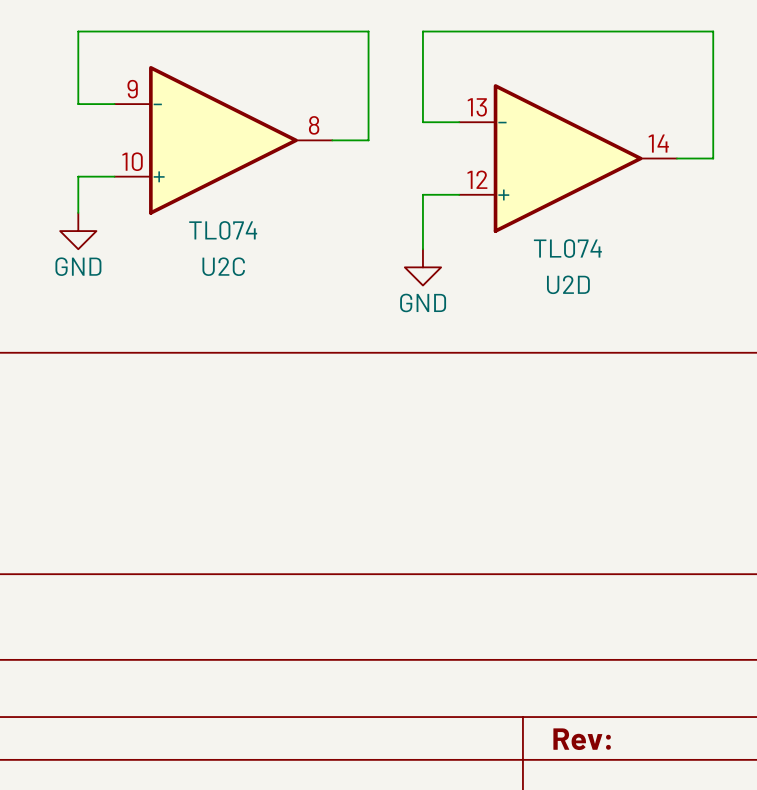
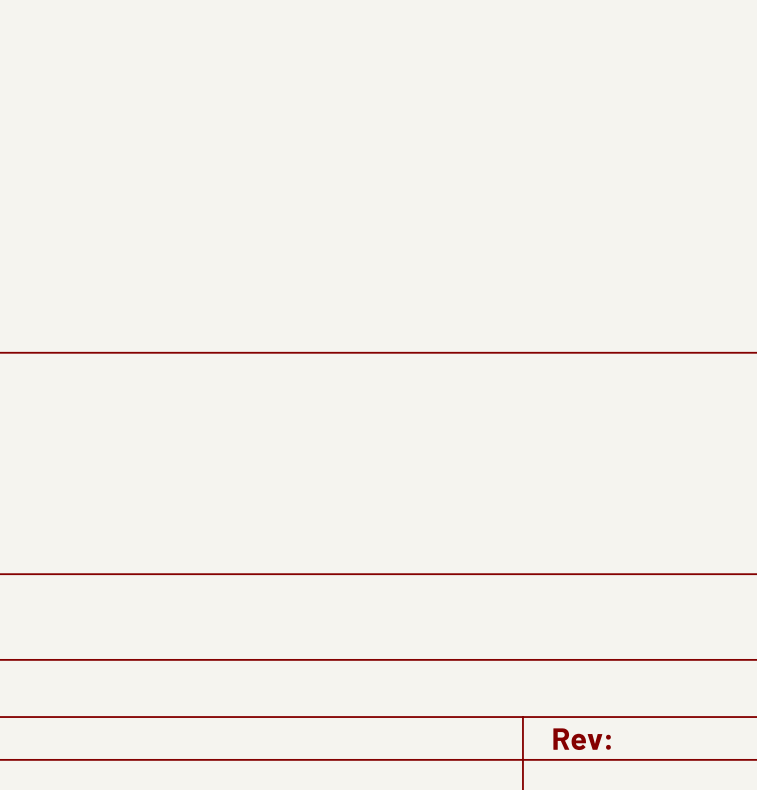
wire: (114, 104) (78, 104) (78, 31) (368, 31) (368, 140) (332, 140) -> none
wire: (459, 122) (422, 122) (422, 31) (713, 31) (713, 158) (676, 158) -> none
U2C: TL074 (223, 140) -> none
U2D: TL074 (568, 158) -> none
wire: (114, 176) (78, 176) (78, 212) -> none
wire: (459, 194) (422, 194) (422, 249) -> none
power symbol: GND (78, 231) -> none
power symbol: GND (422, 267) -> none

